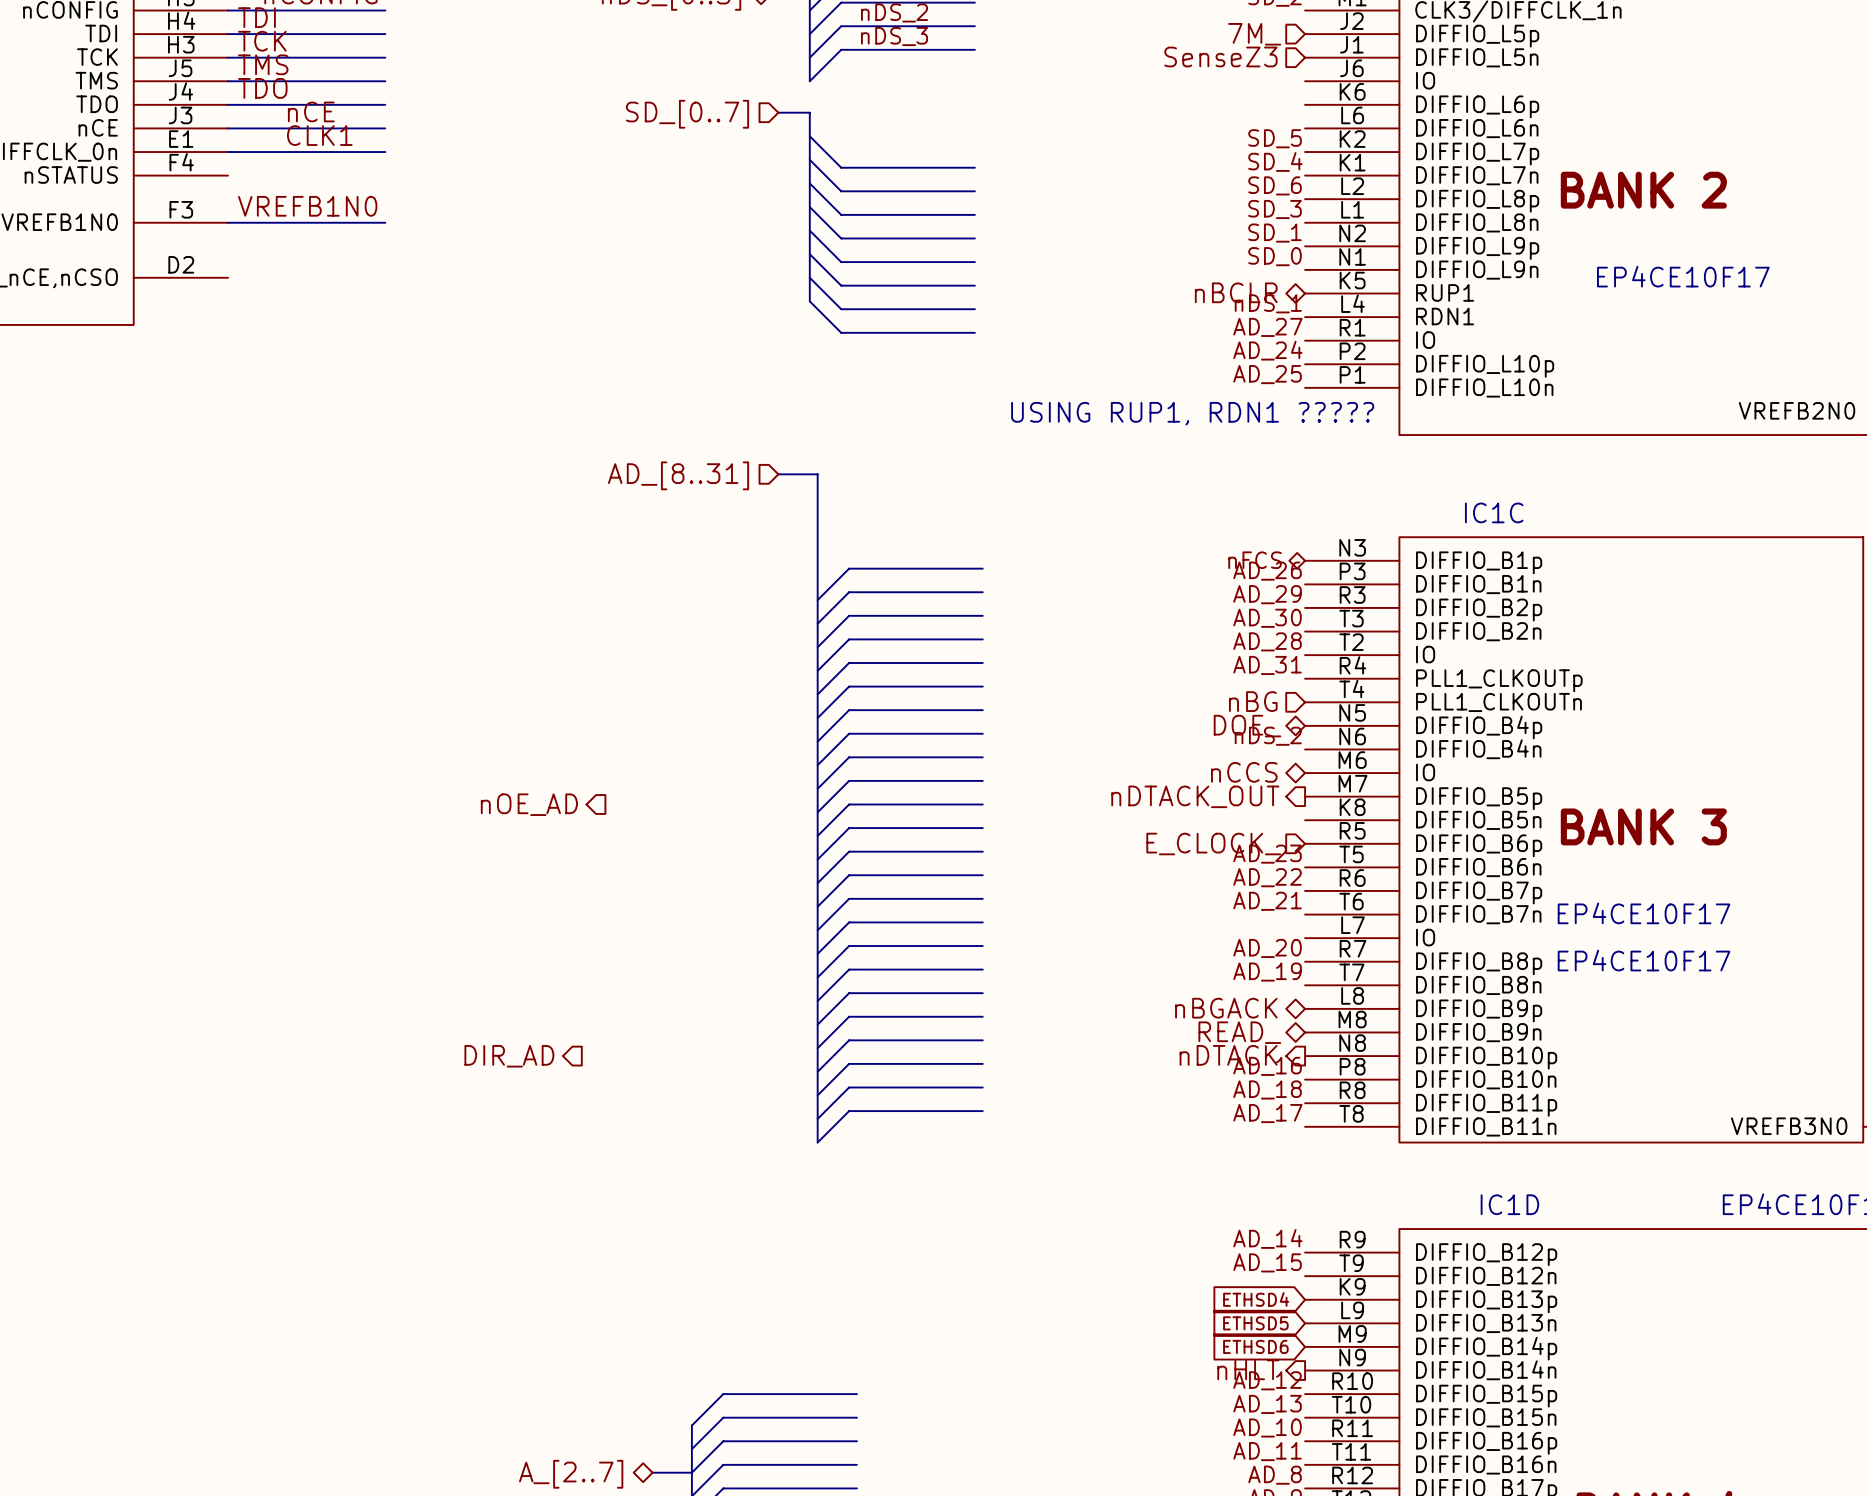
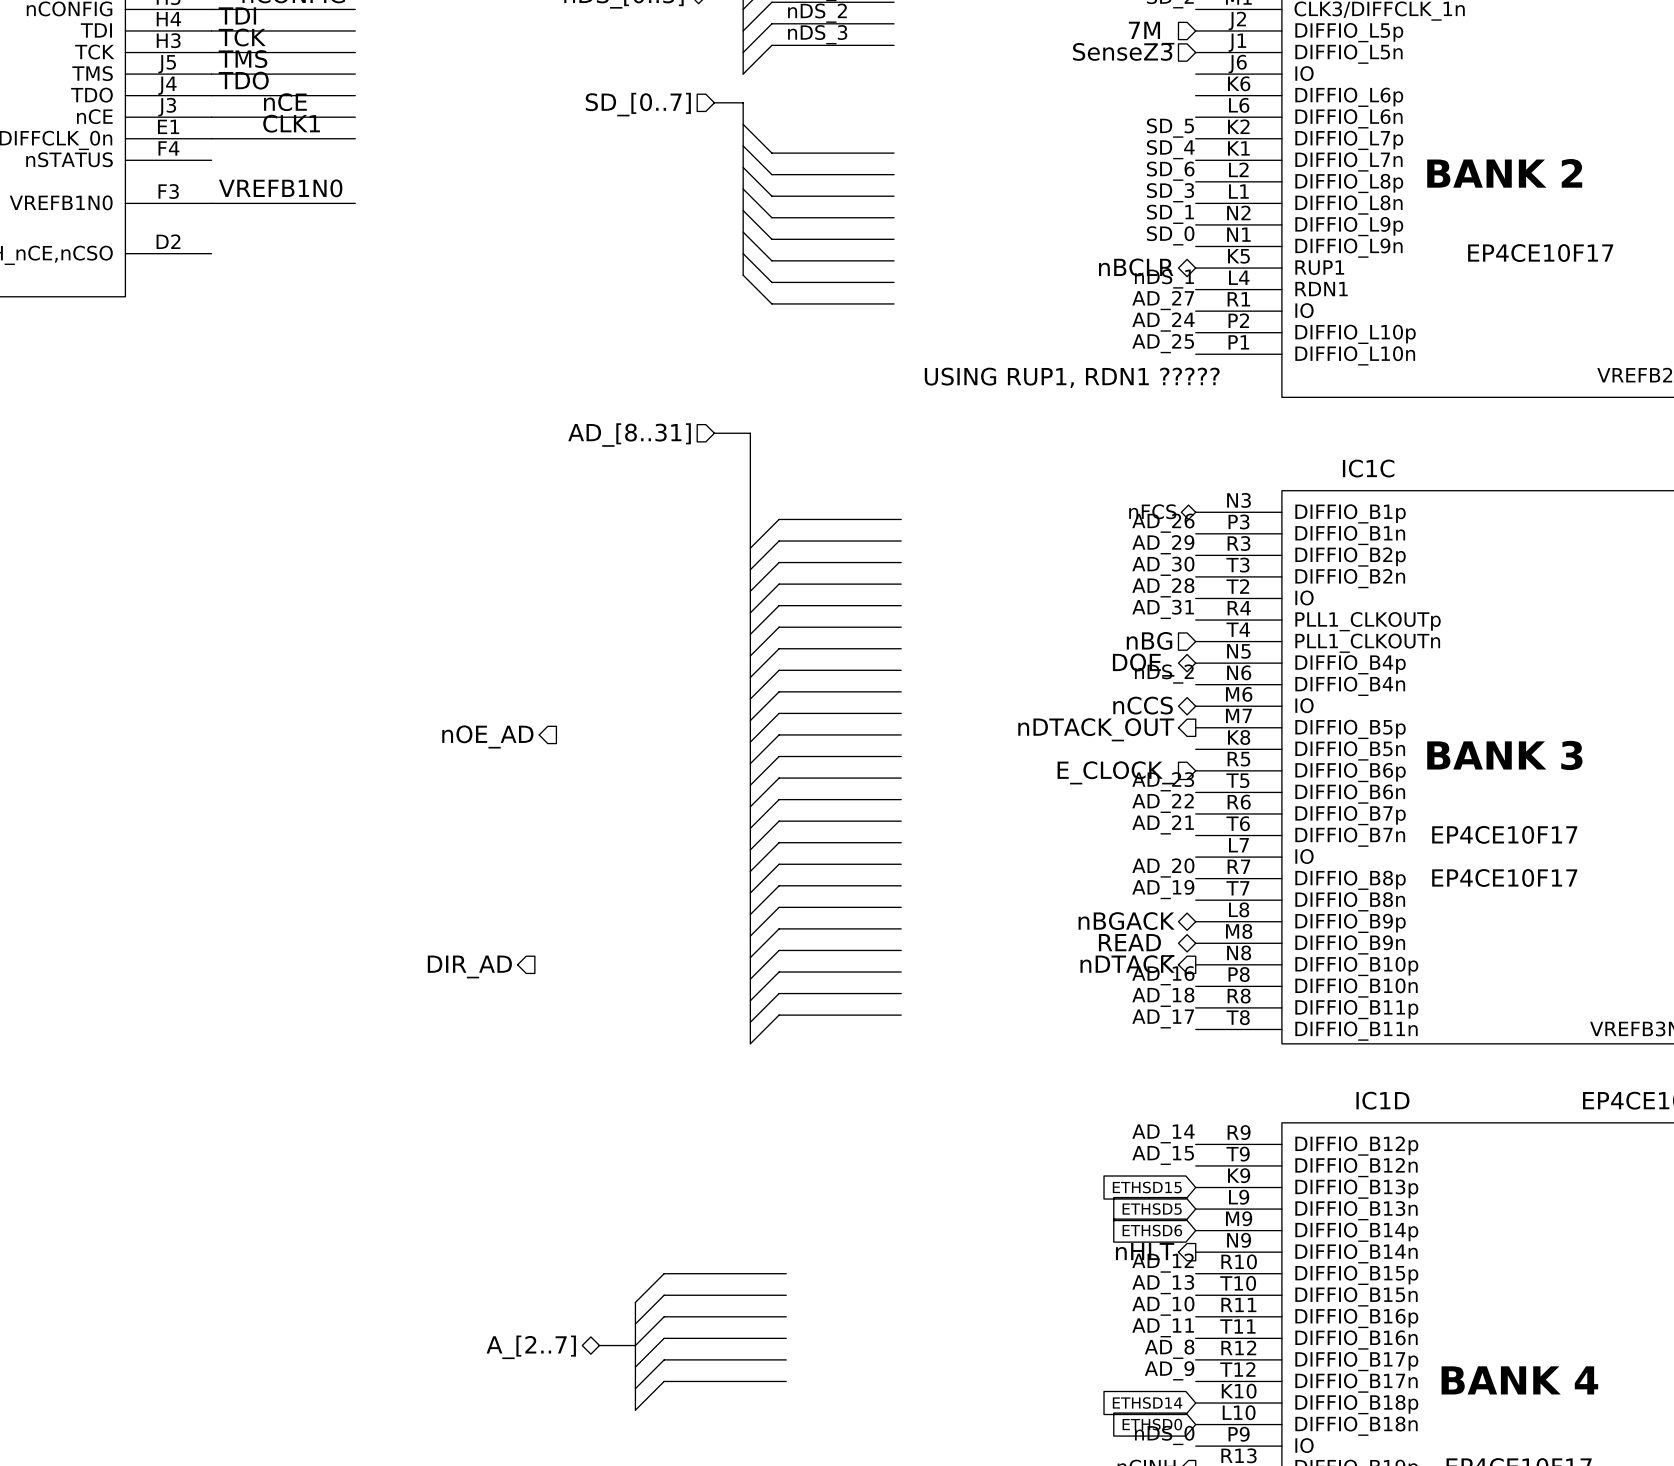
global label: ETHSD4 (1256, 1299) -> ETHSD15 (1147, 1187)

